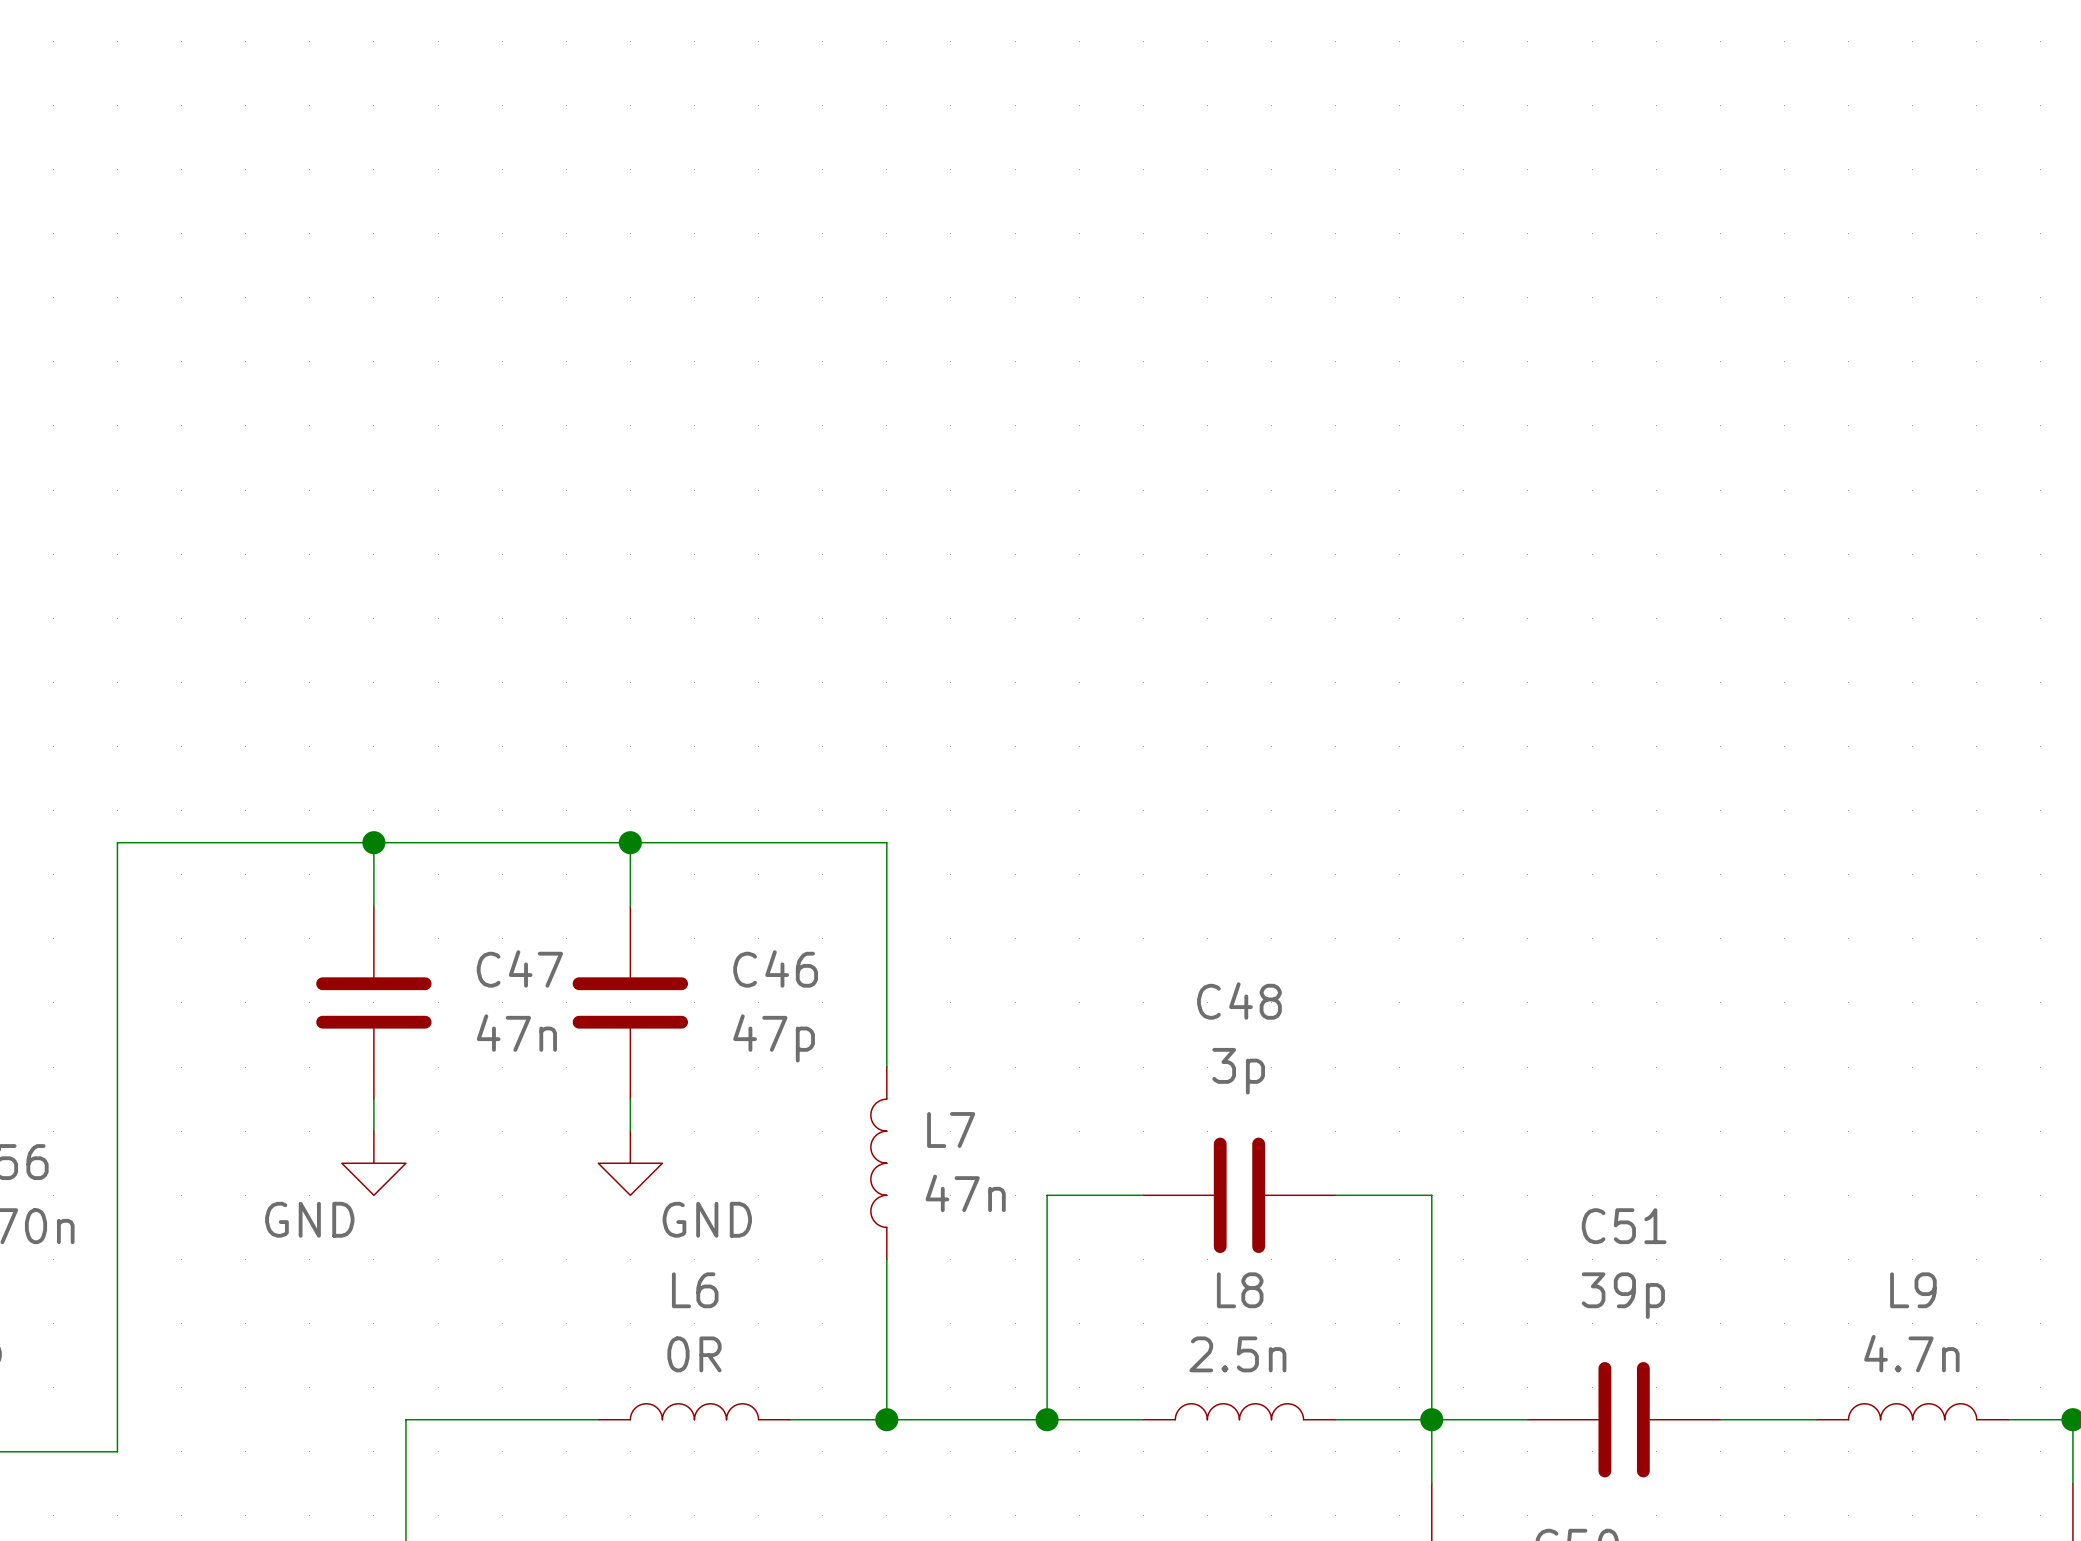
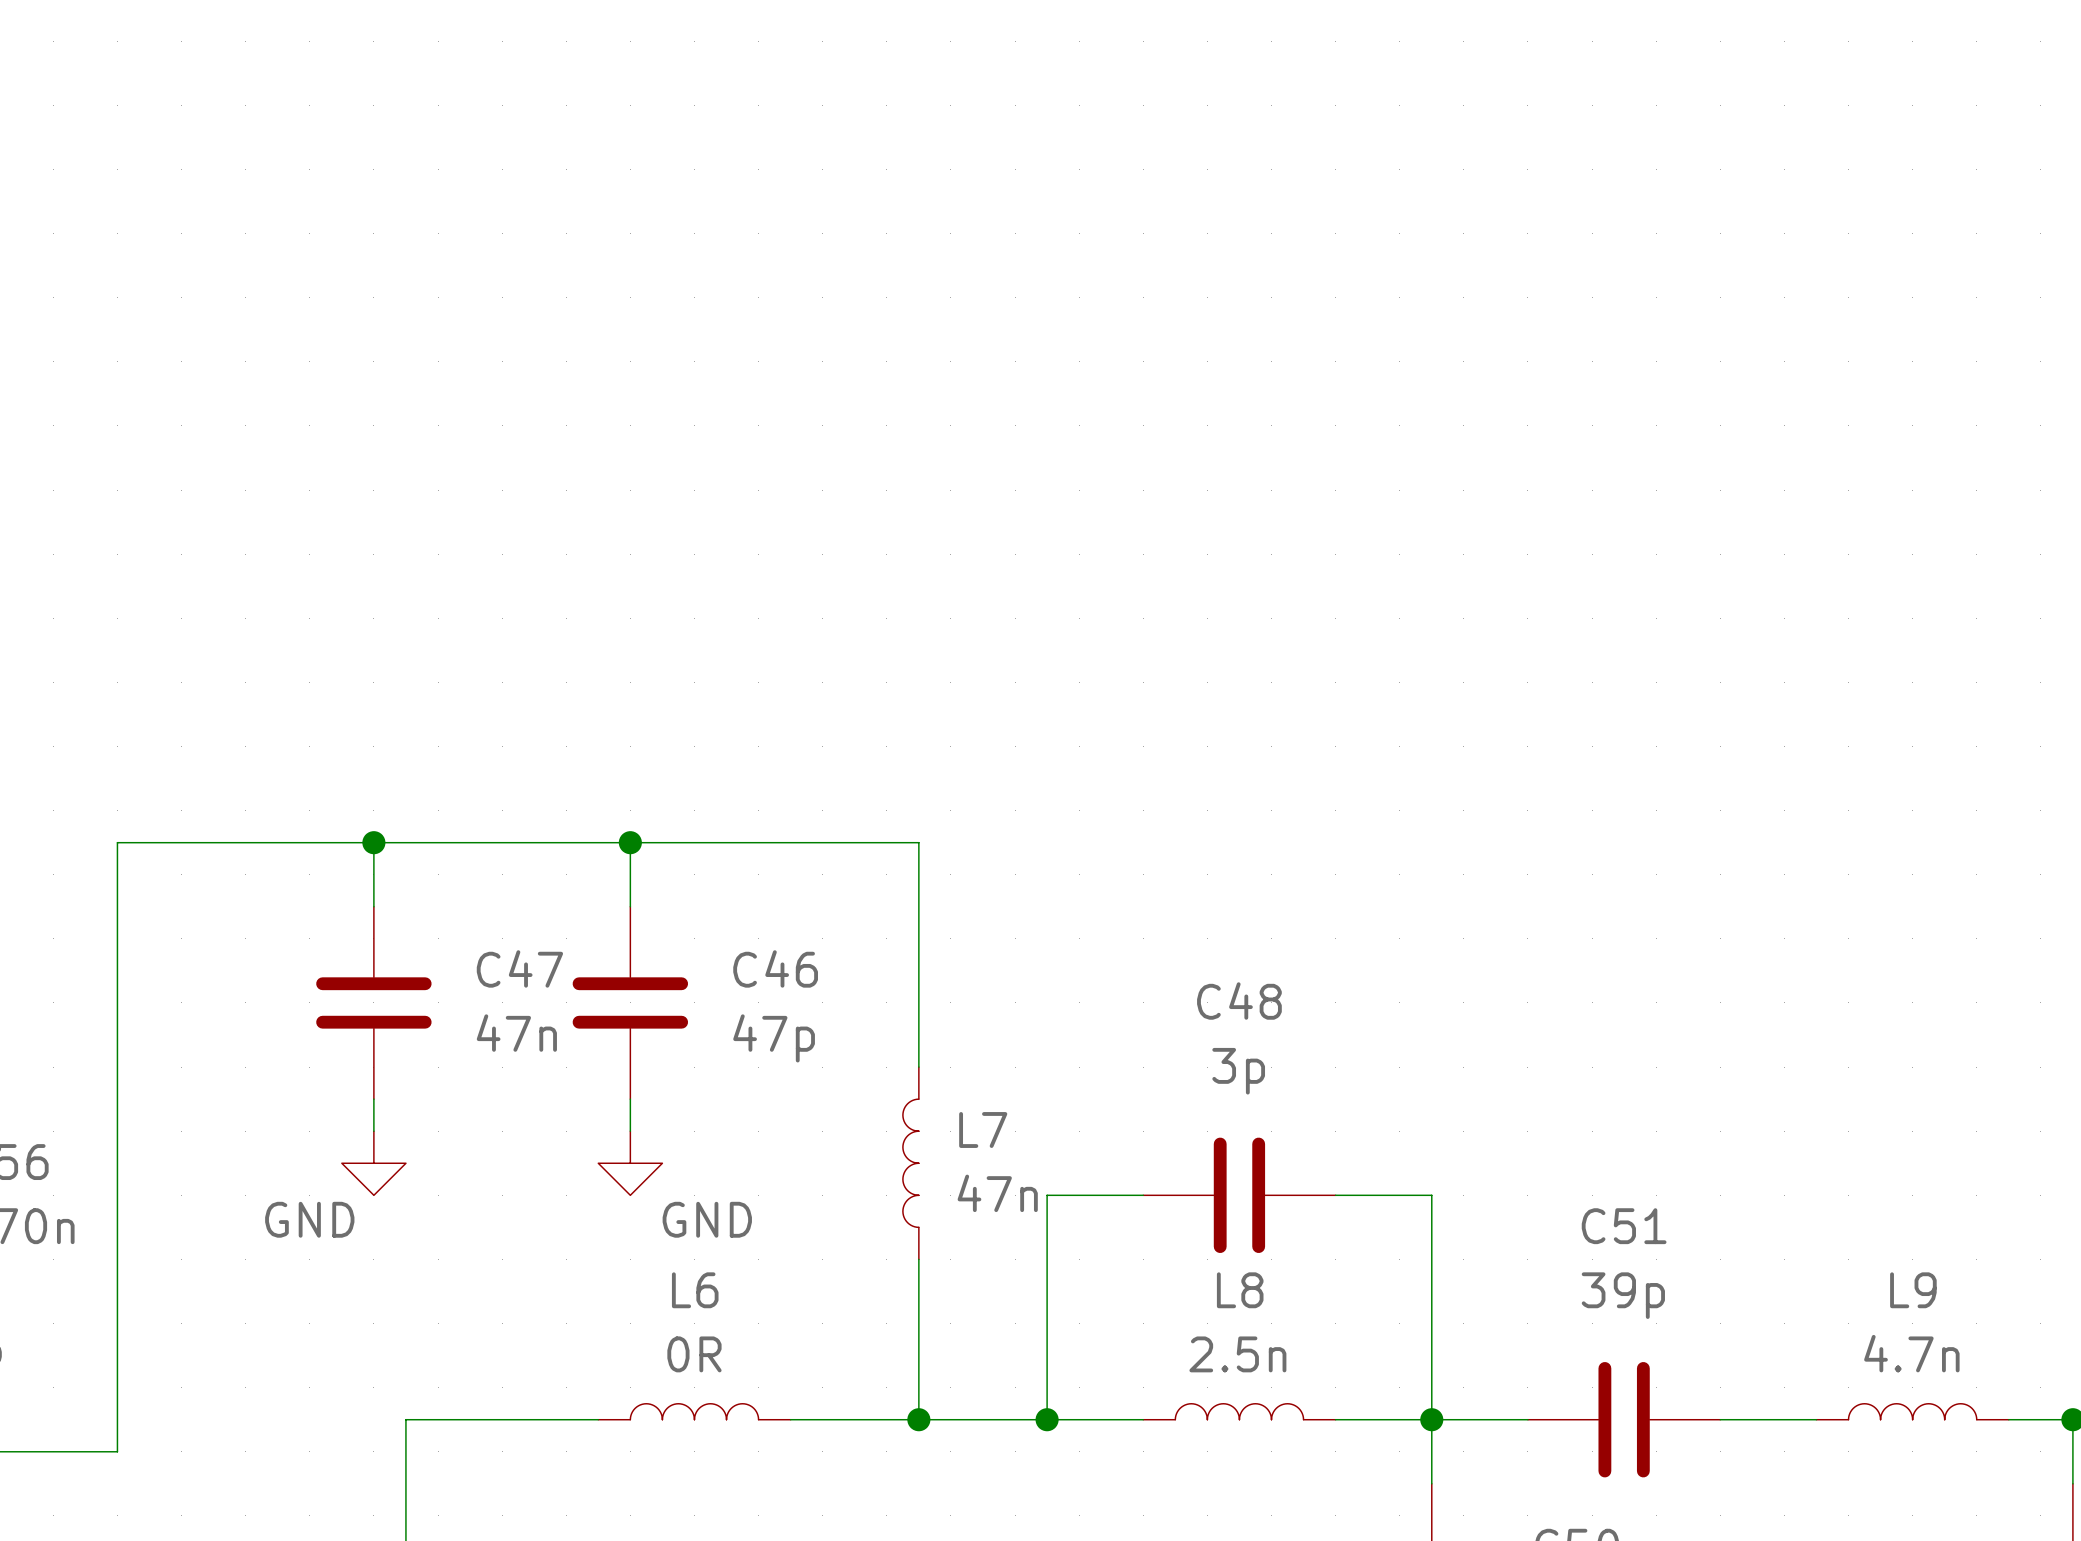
wire: (886, 842) (886, 1067) -> (886, 842) (918, 842) (918, 1067)
L7 position: (878, 1163) -> (910, 1163)
wire: (886, 1259) (886, 1419) -> (918, 1259) (918, 1419)
junction position: (886, 1419) -> (918, 1419)

